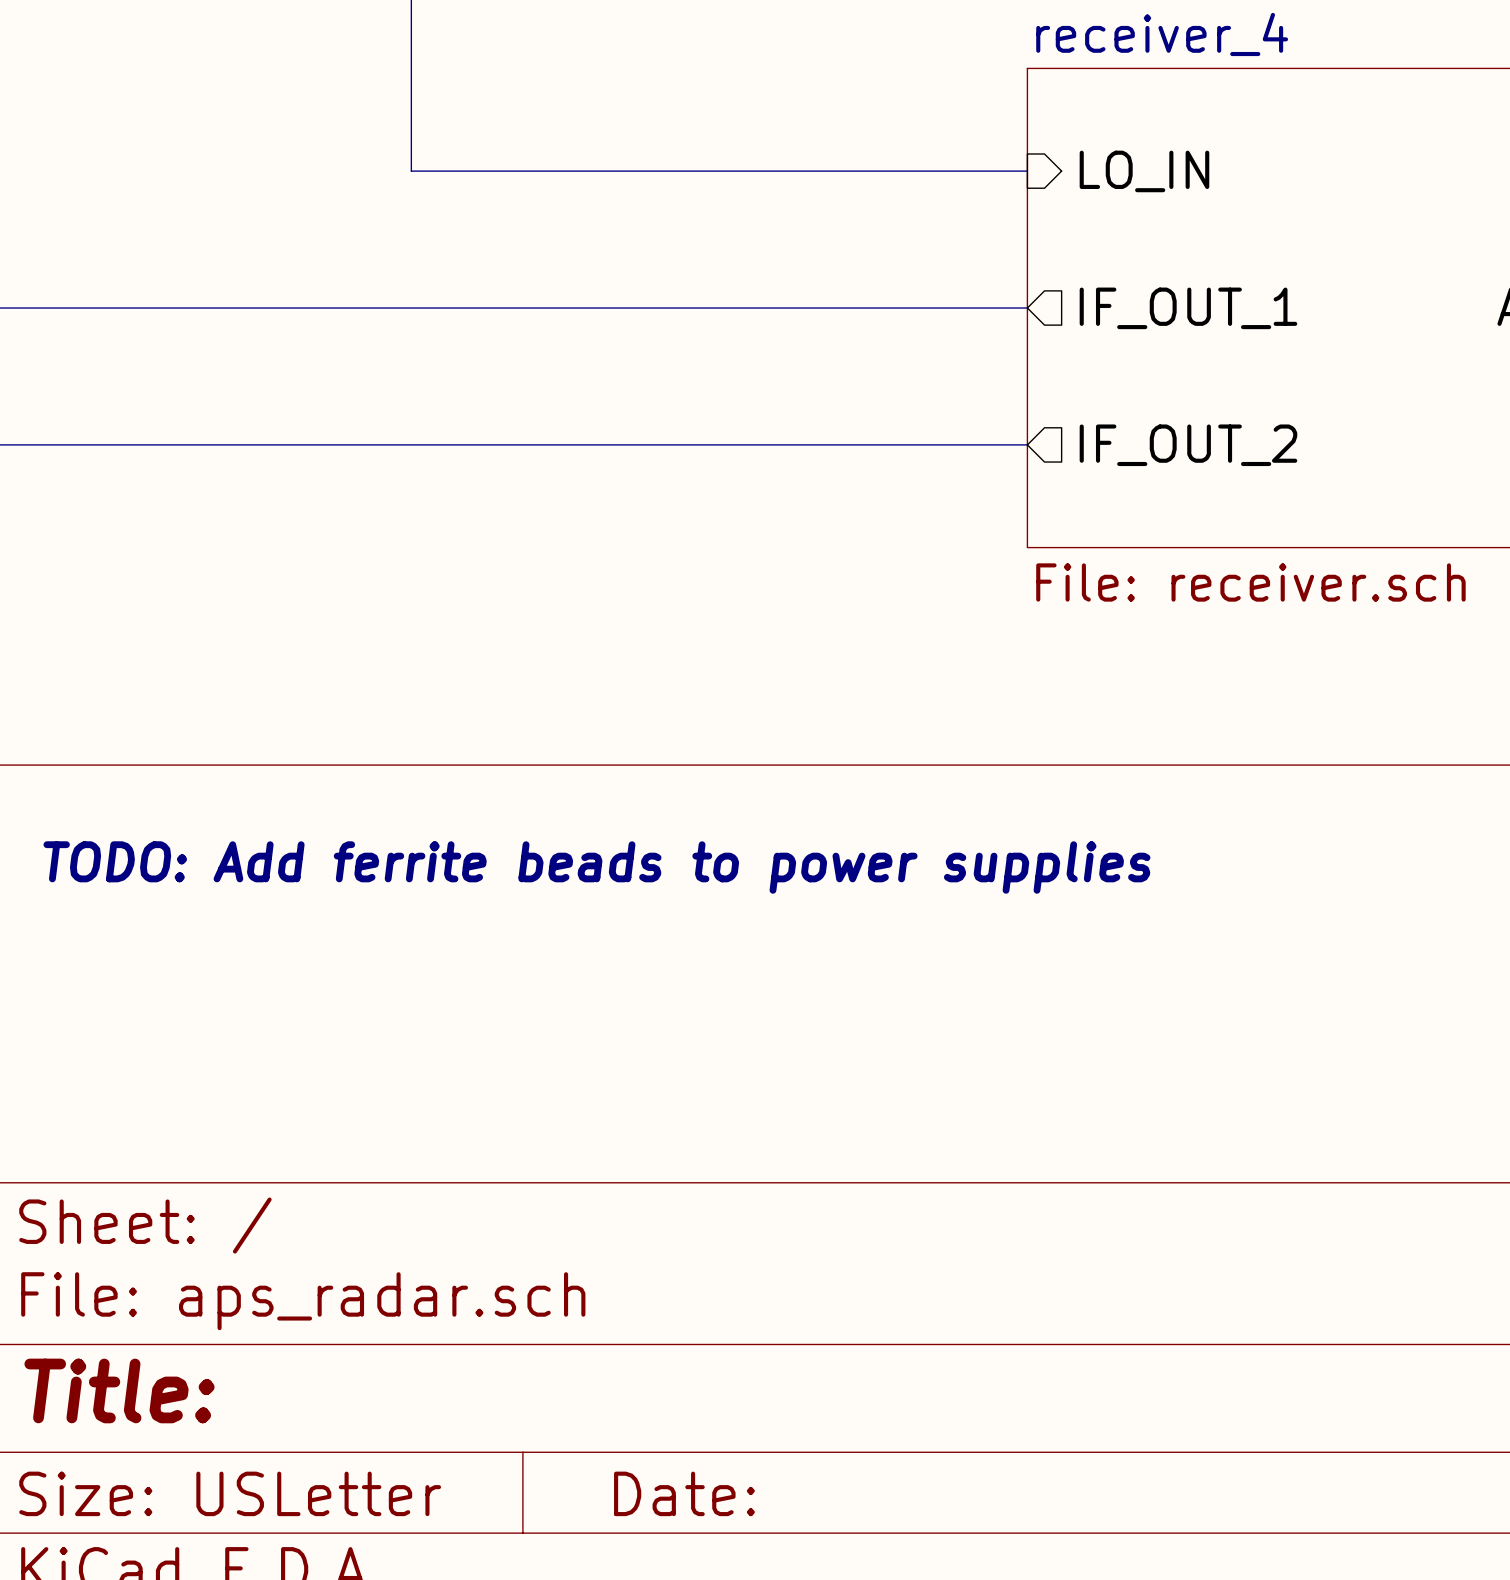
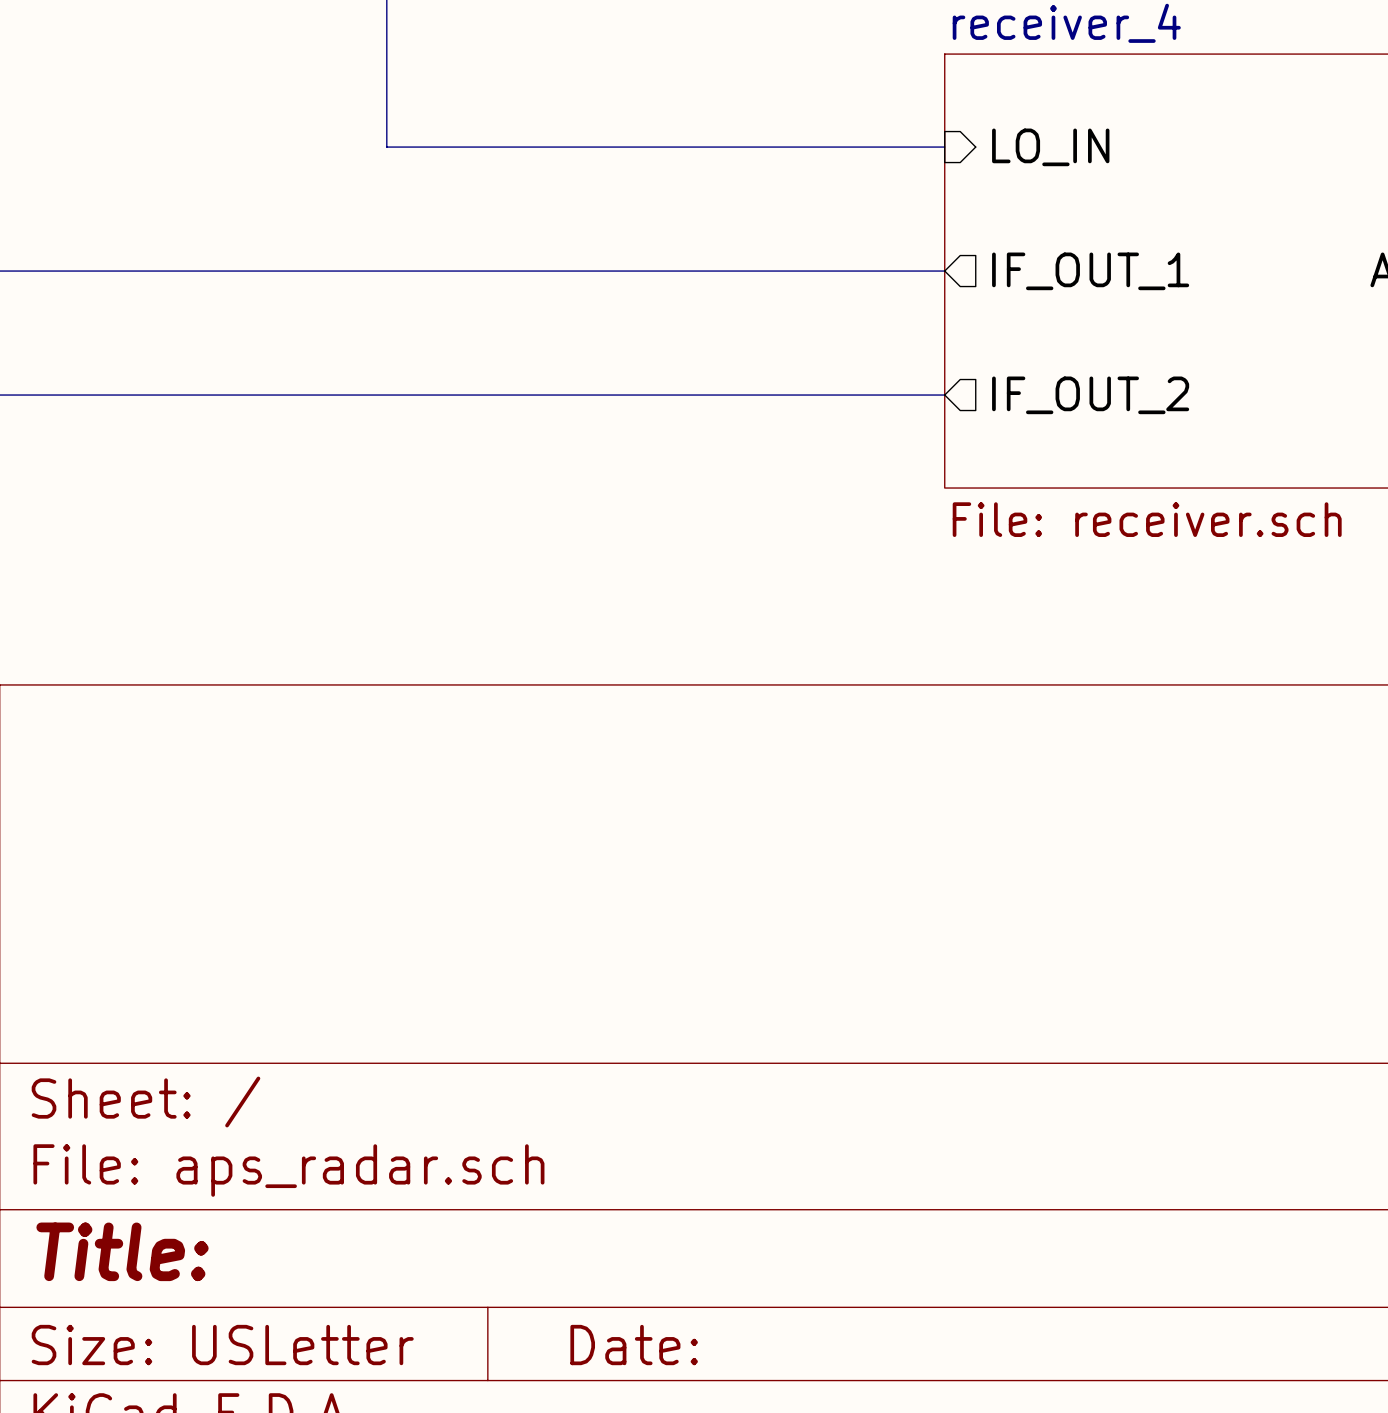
text: TODO: Add ferrite beads to power supplies (596, 867) -> none

